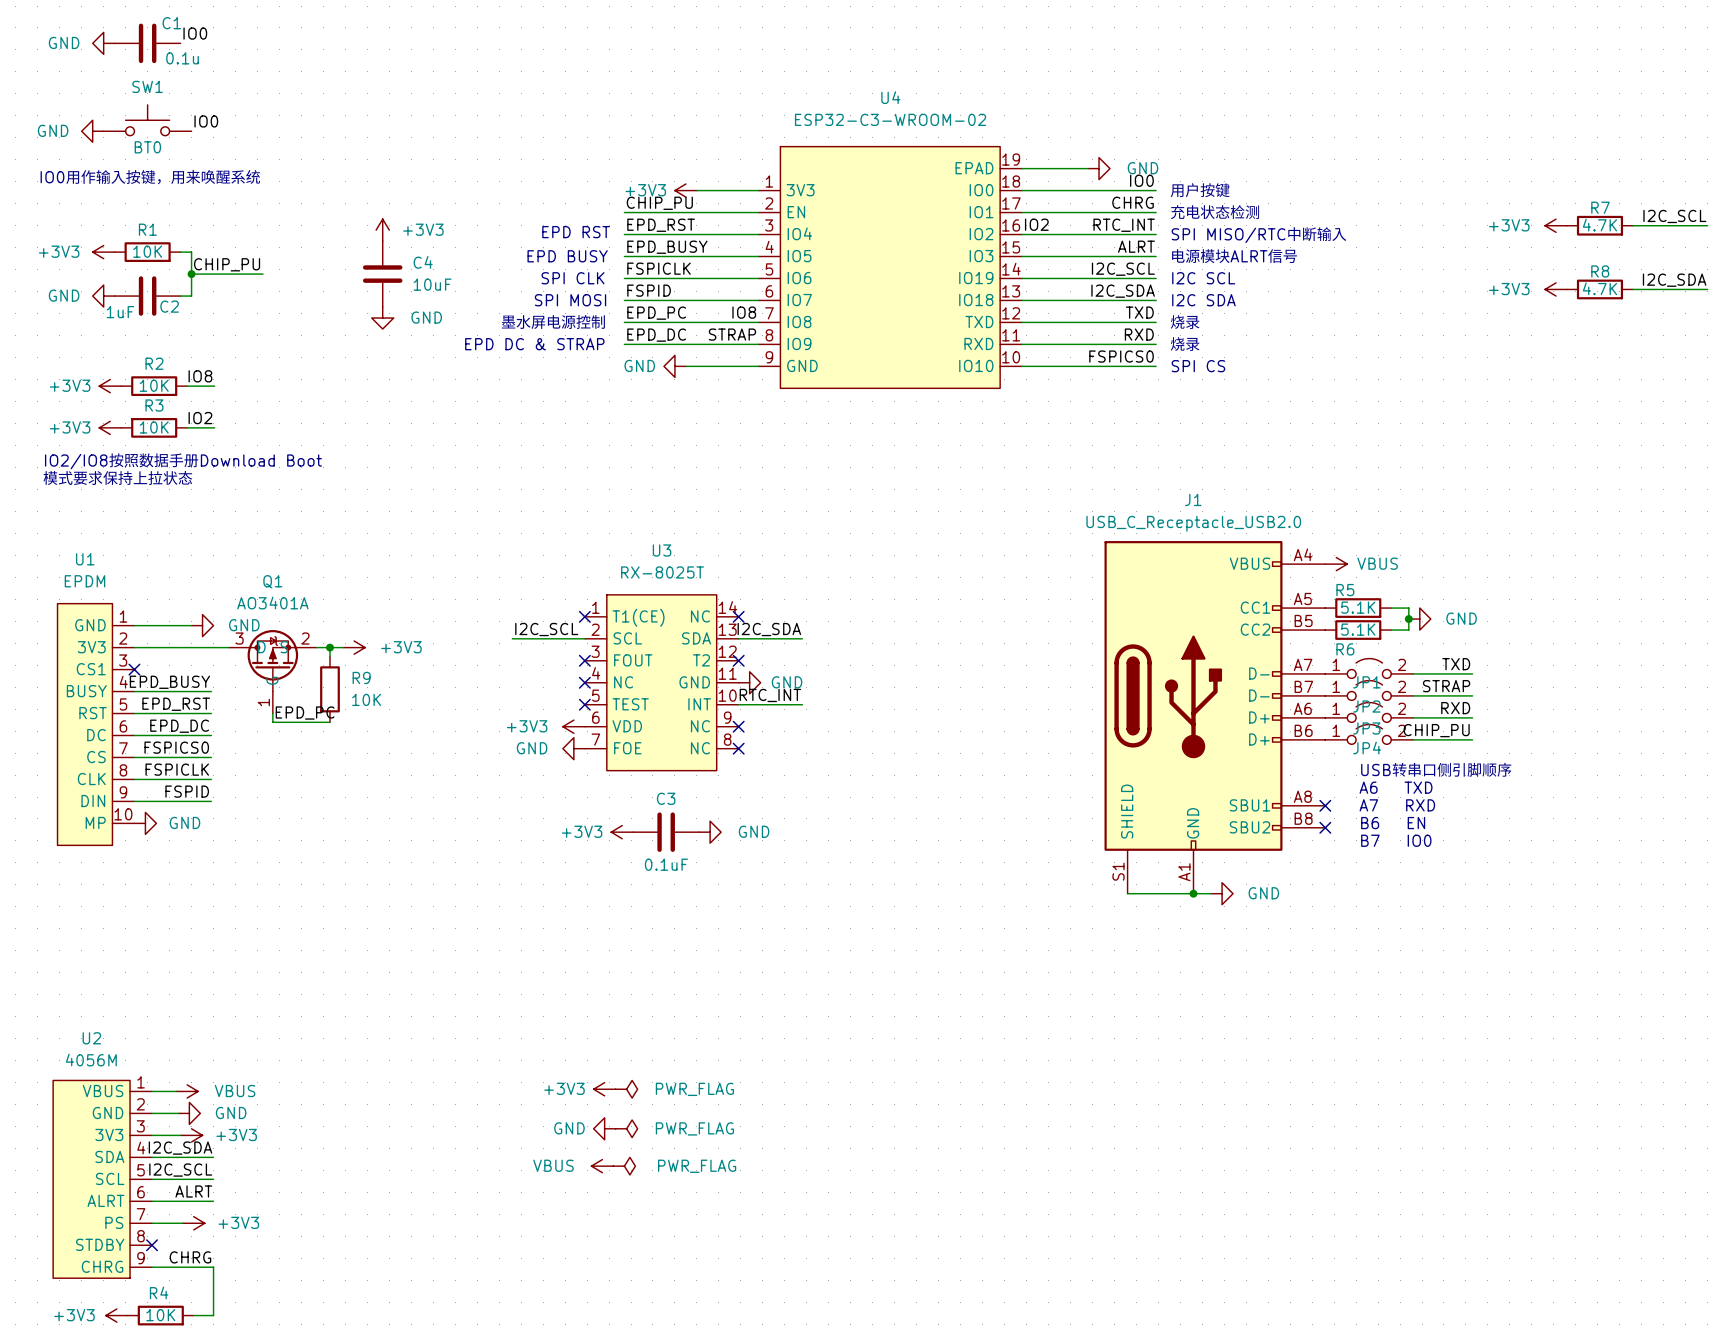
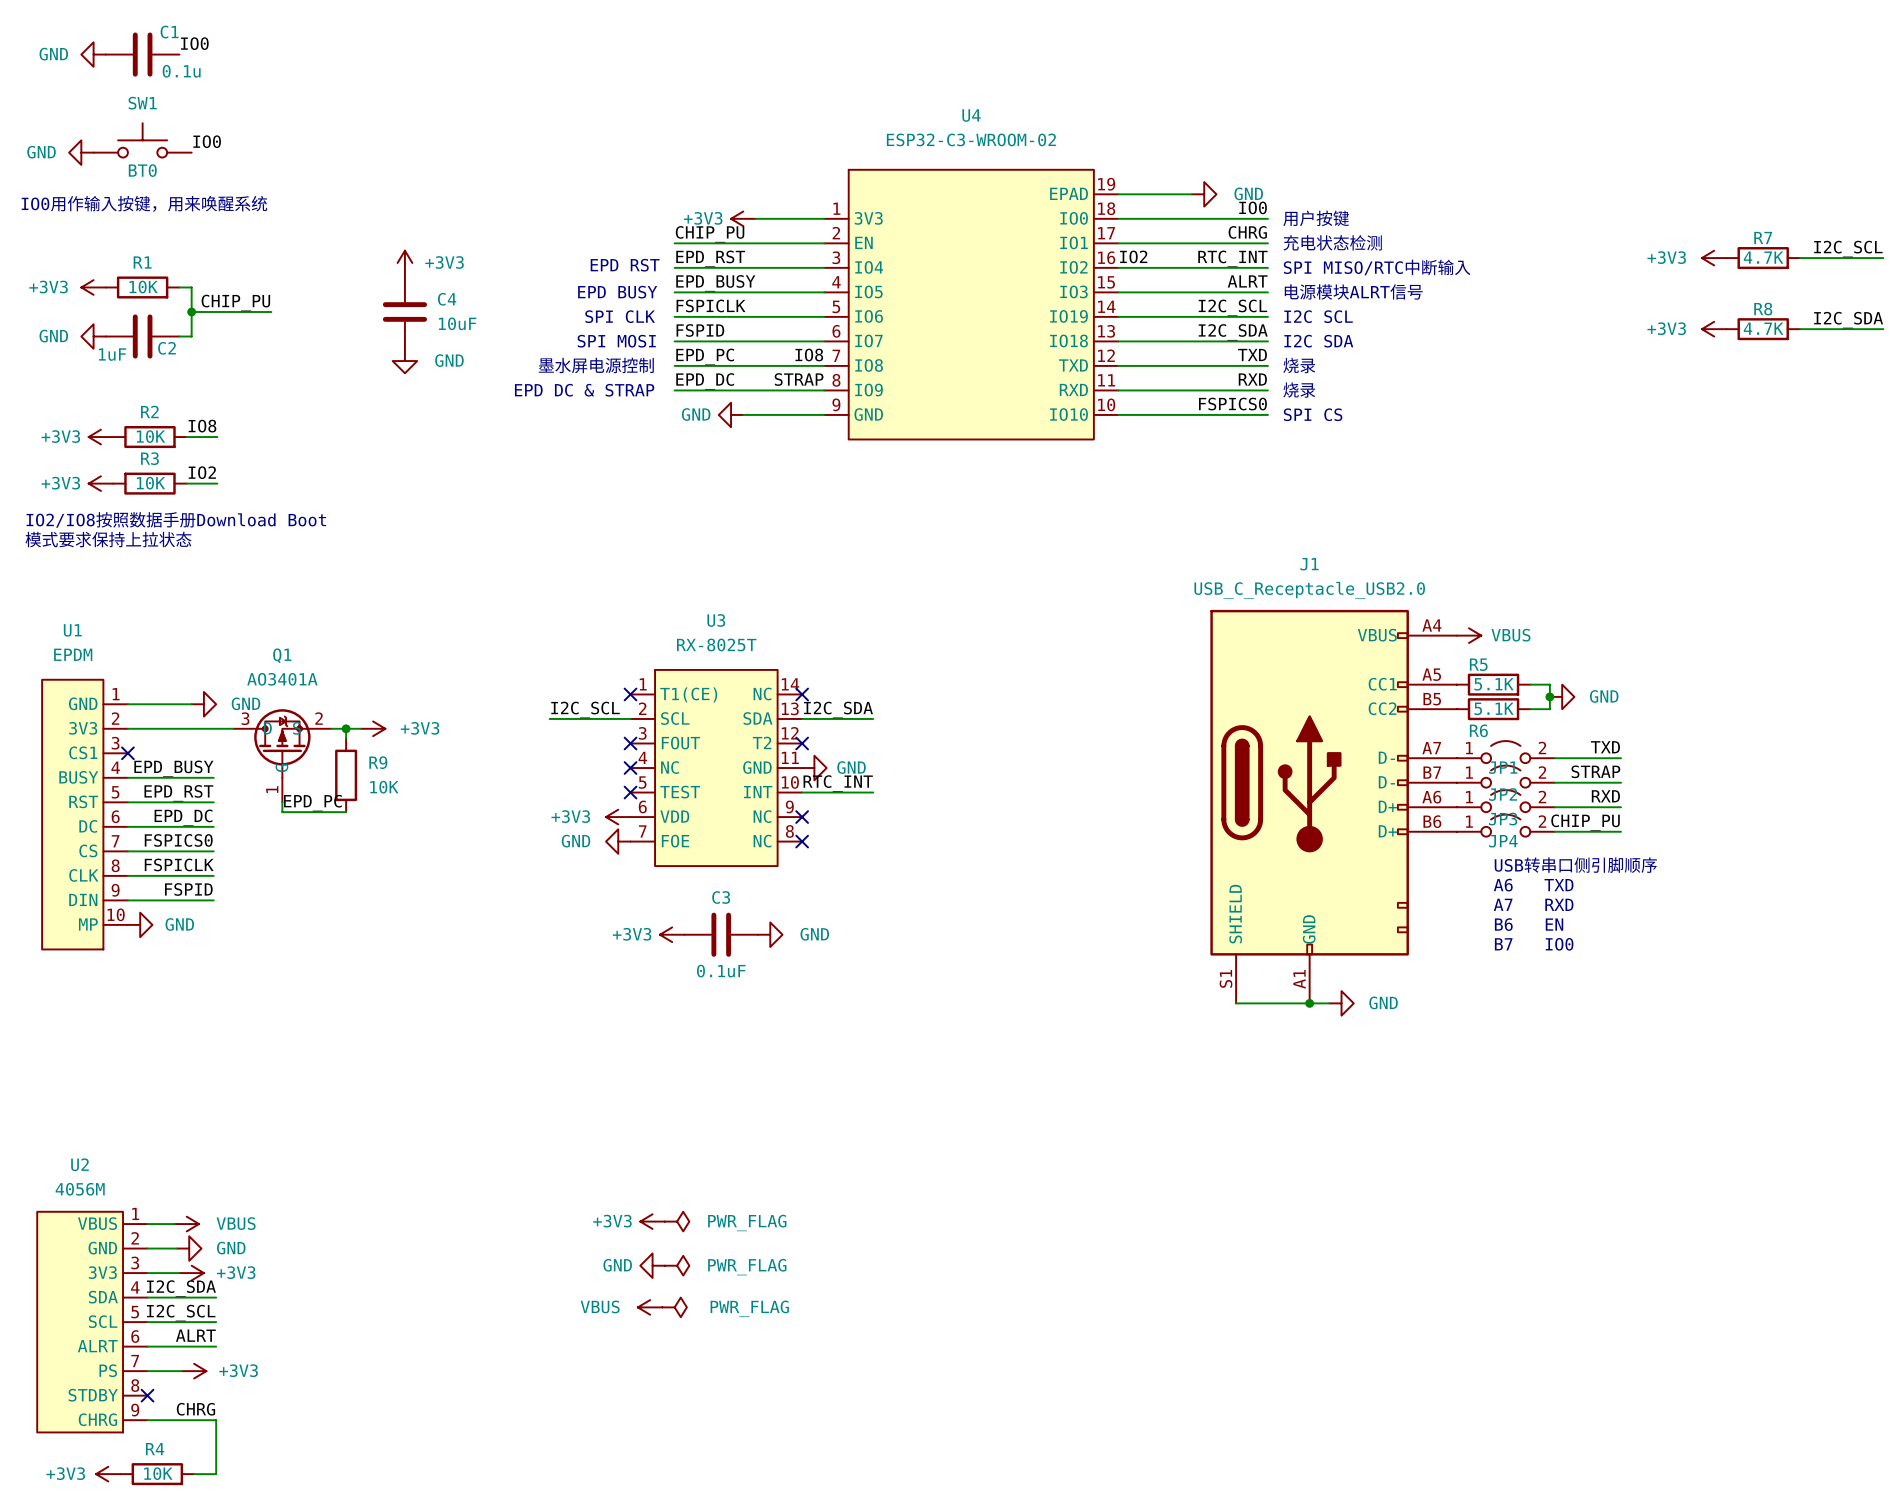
J1 symbol: [1104, 541, 1326, 894] -> [1210, 609, 1457, 1004]
no-connect mark: (1325, 805) -> none
no-connect mark: (1325, 827) -> none

